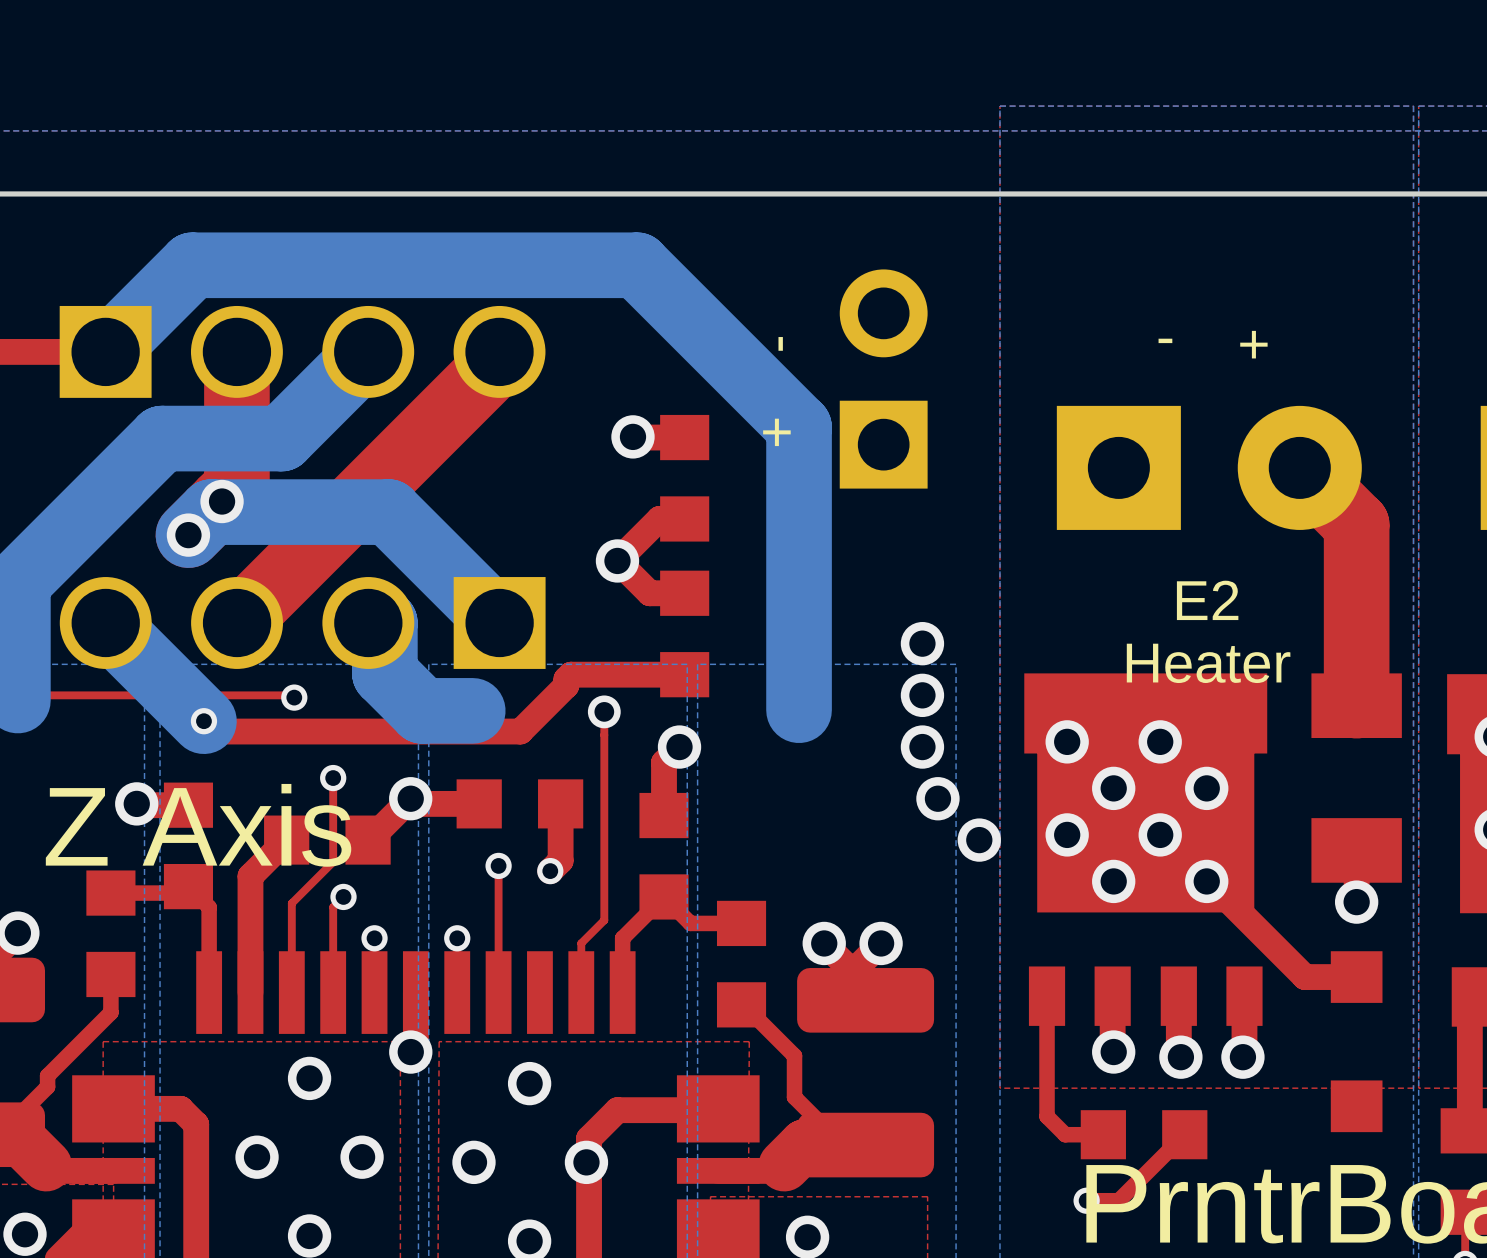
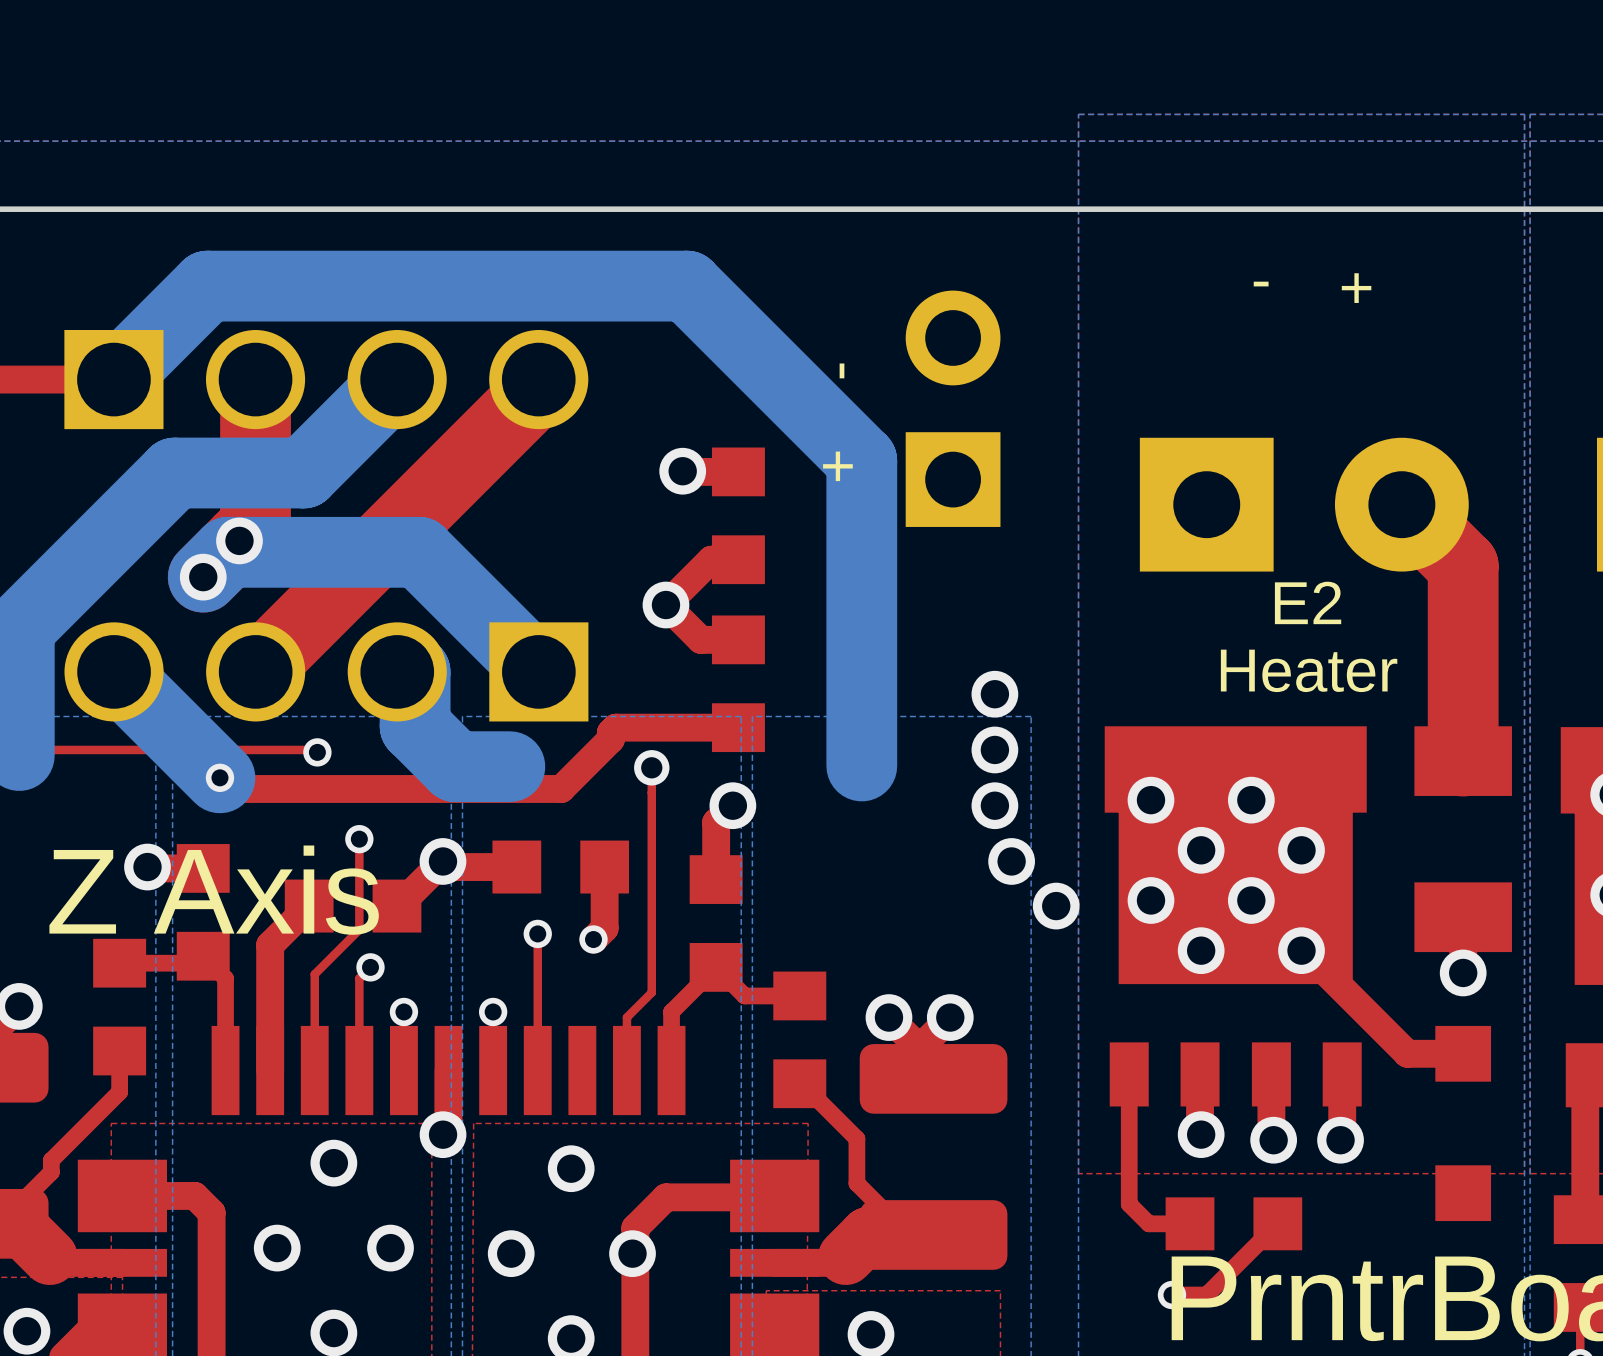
text position: + - (1213, 344) -> + - (1312, 288)
text position: E2 (1207, 600) -> E2 (1308, 602)
text position: Heater (1208, 663) -> Heater (1309, 670)

